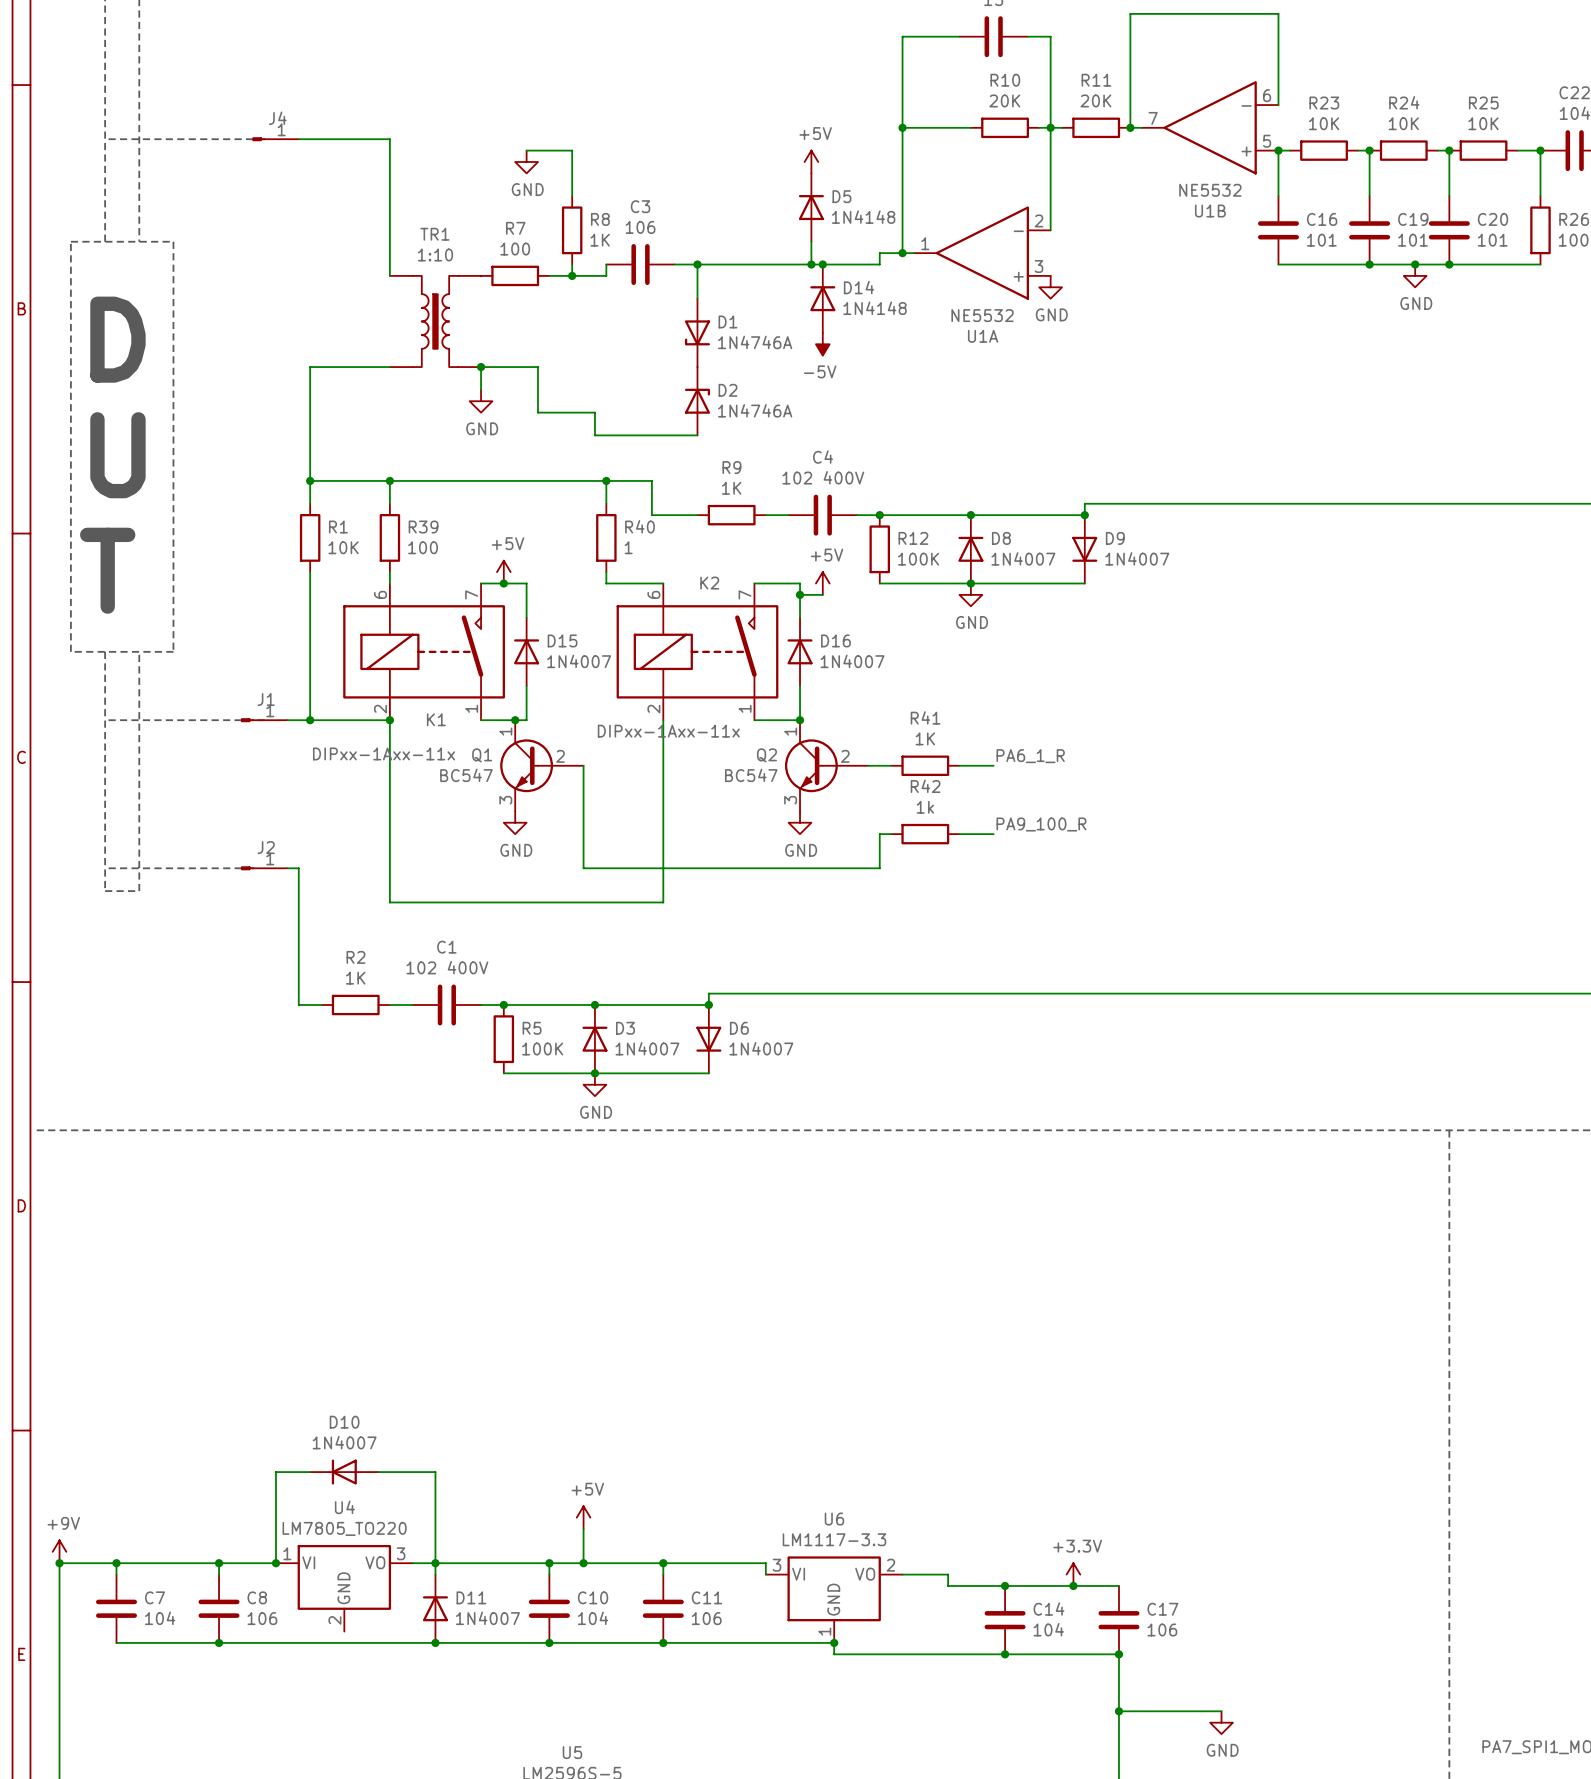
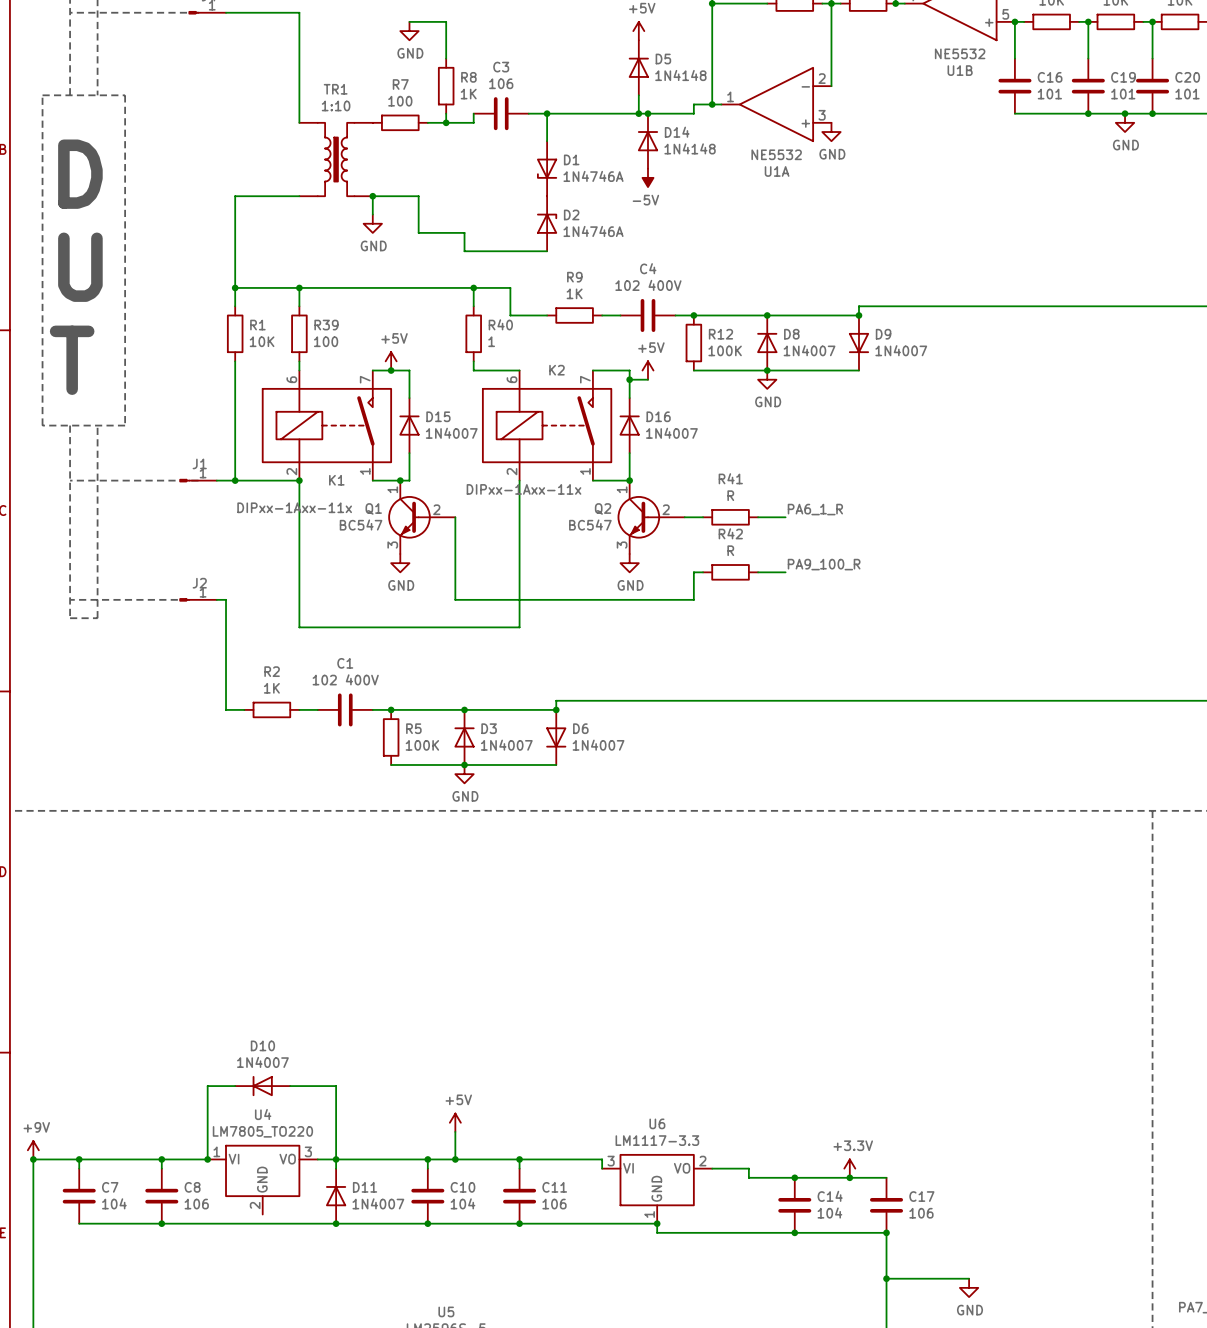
R41 value: 1K (925, 738) -> R (730, 495)
R42 value: 1k (925, 807) -> R (730, 550)

